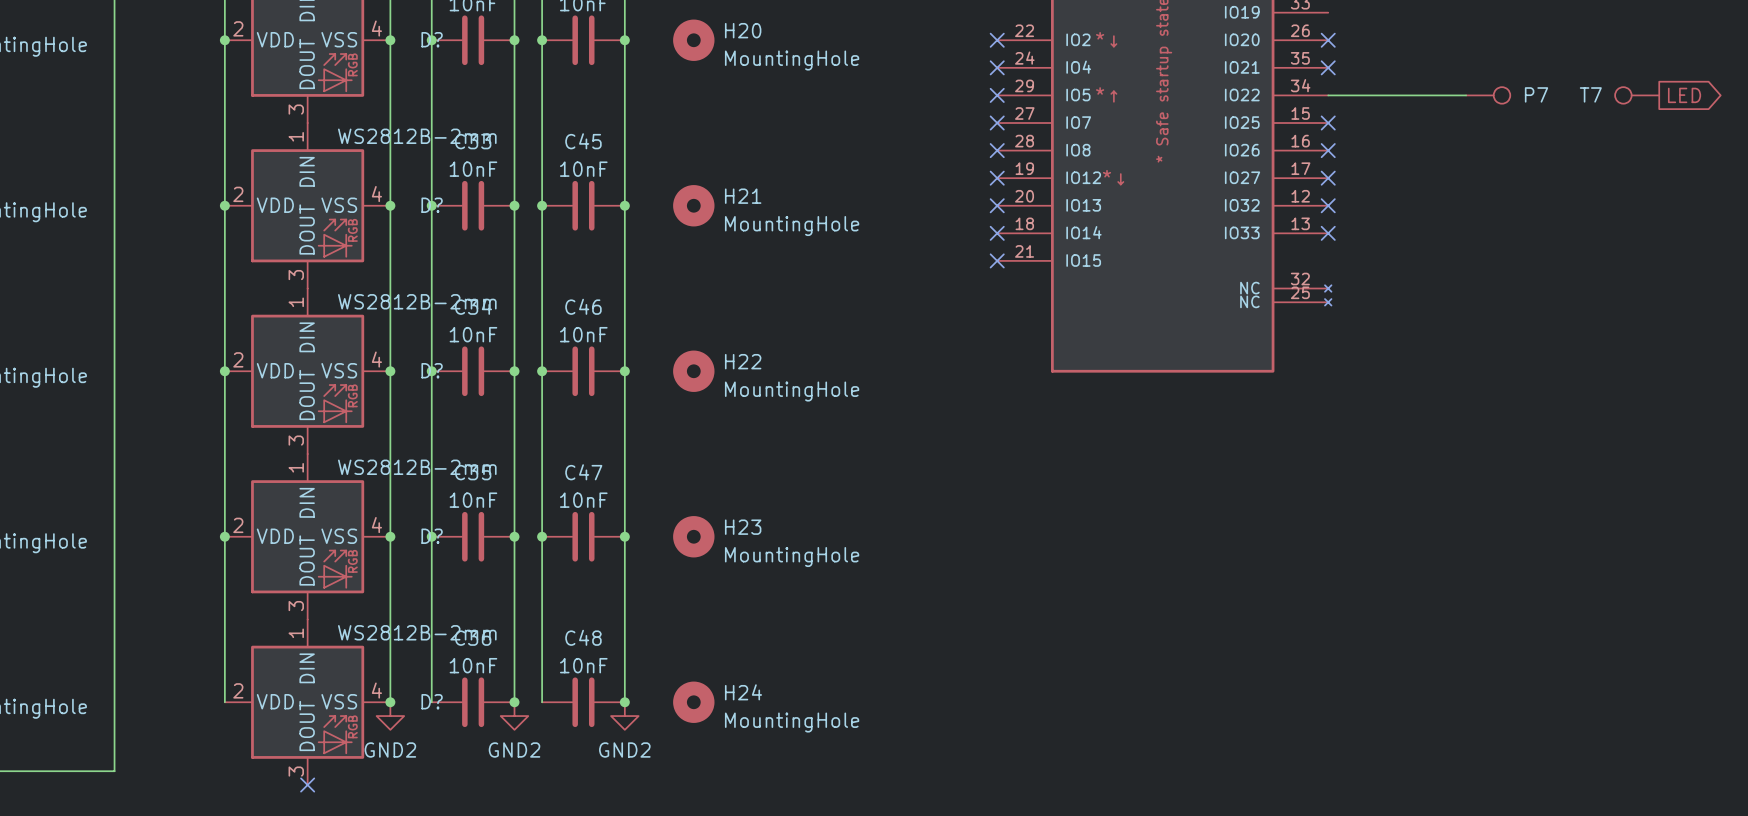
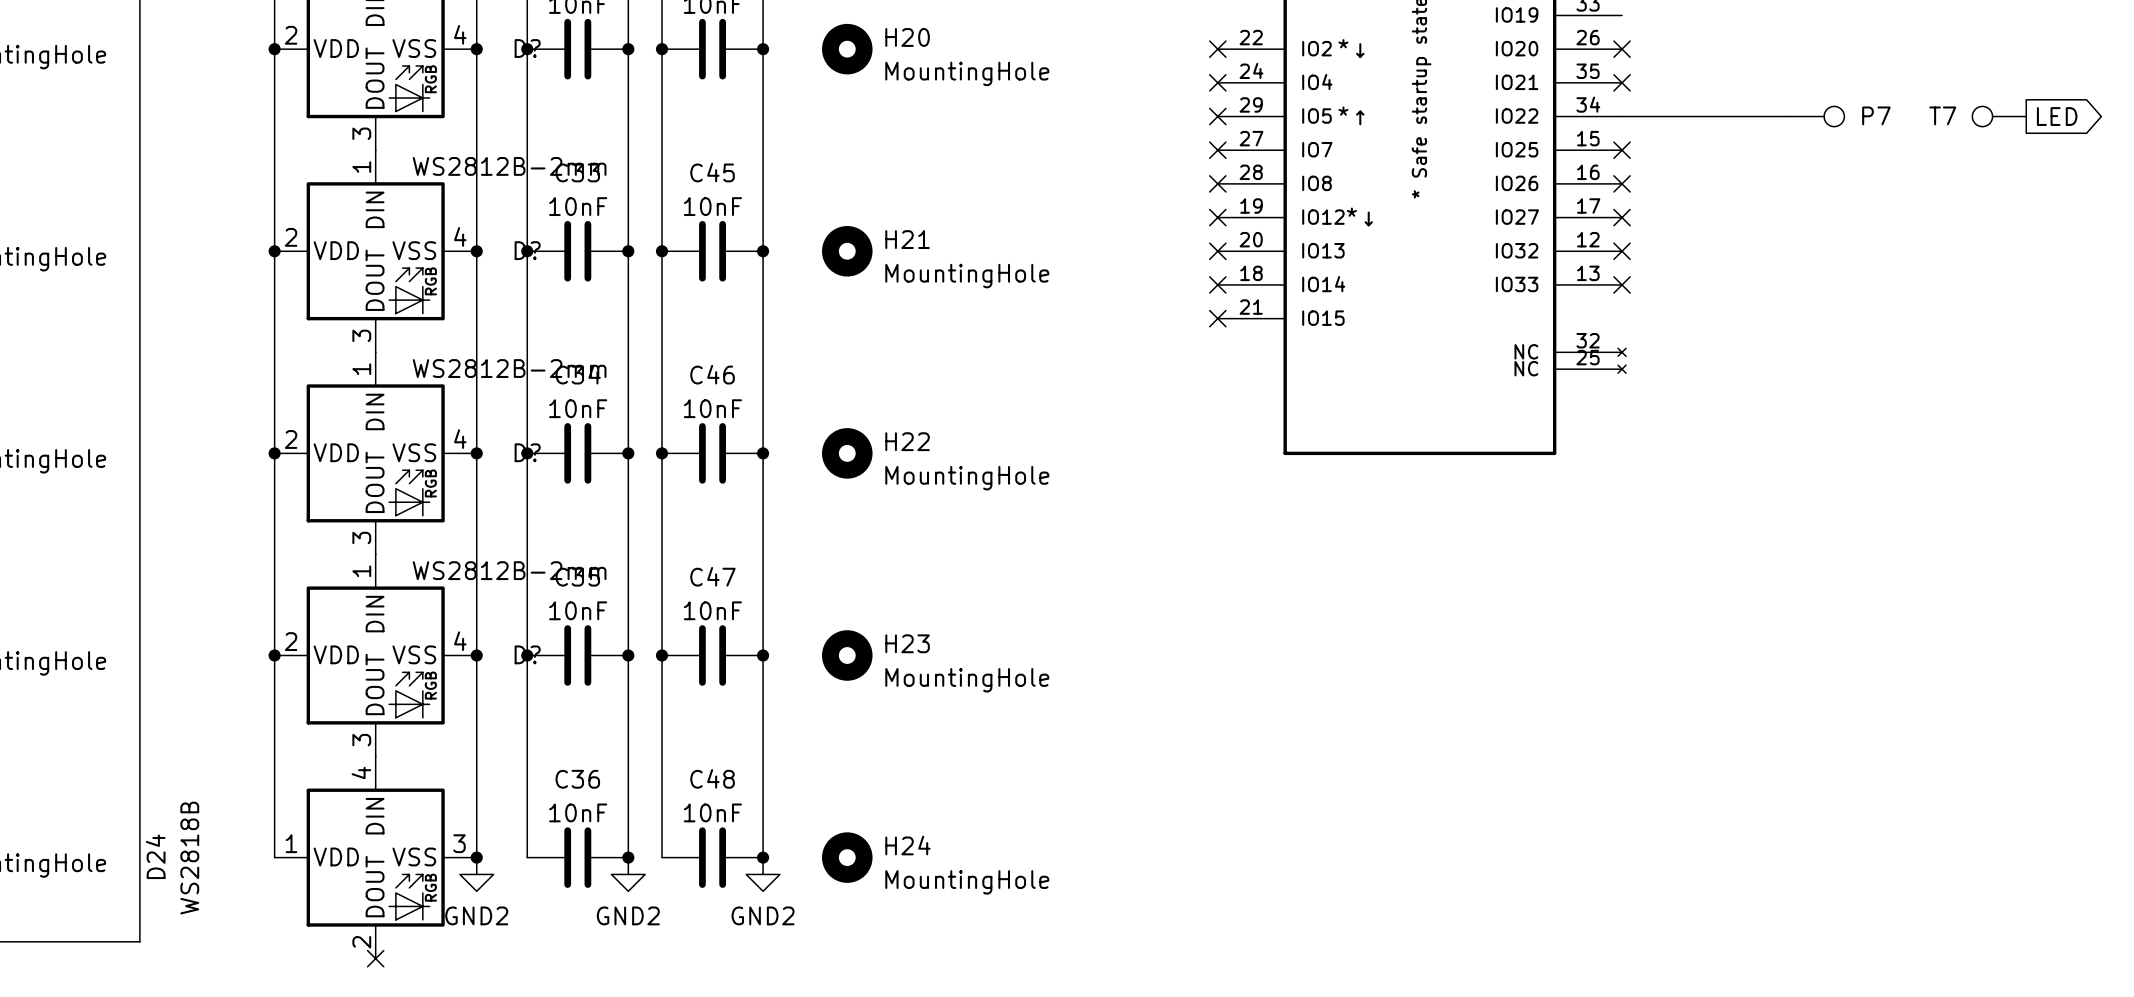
D? value: WS2812B-2mm (417, 632) -> WS2818B (189, 858)
D? pin number: 1 (296, 633) -> 4 (361, 772)
D? pin number: 2 (238, 690) -> 1 (291, 843)
D? pin number: 4 (376, 690) -> 3 (459, 843)
D? name: D? (432, 701) -> D24 (155, 856)
D? pin number: 3 (296, 771) -> 2 (361, 942)

